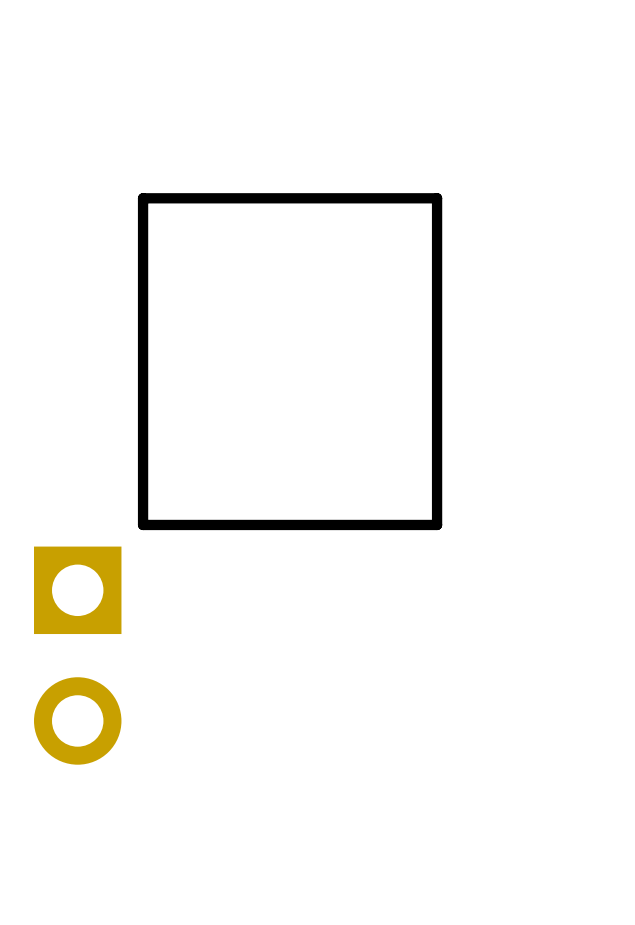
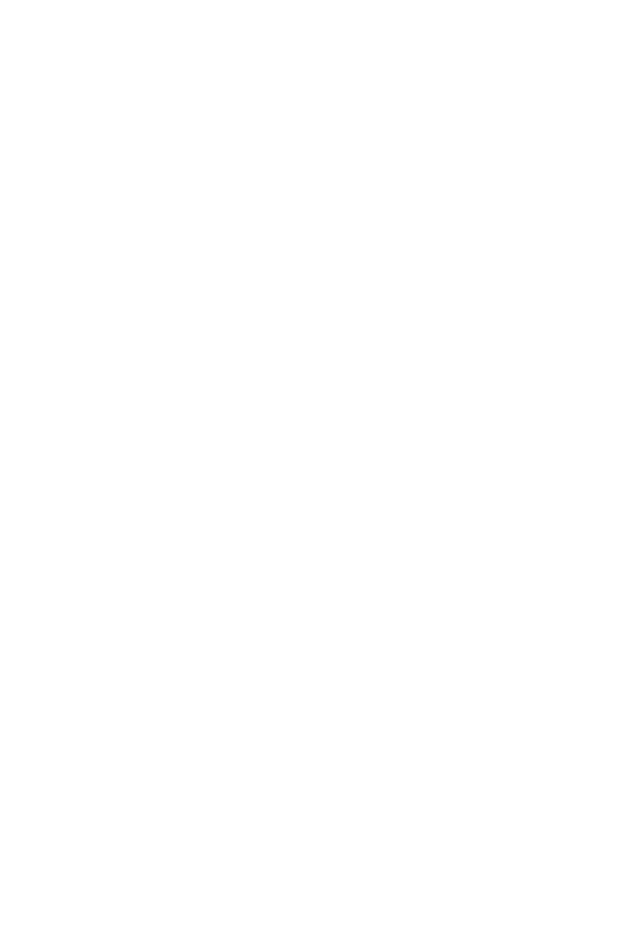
line: (437, 198) (143, 198) (143, 524) (437, 524) (437, 198) -> none
part: (77, 655) -> none

